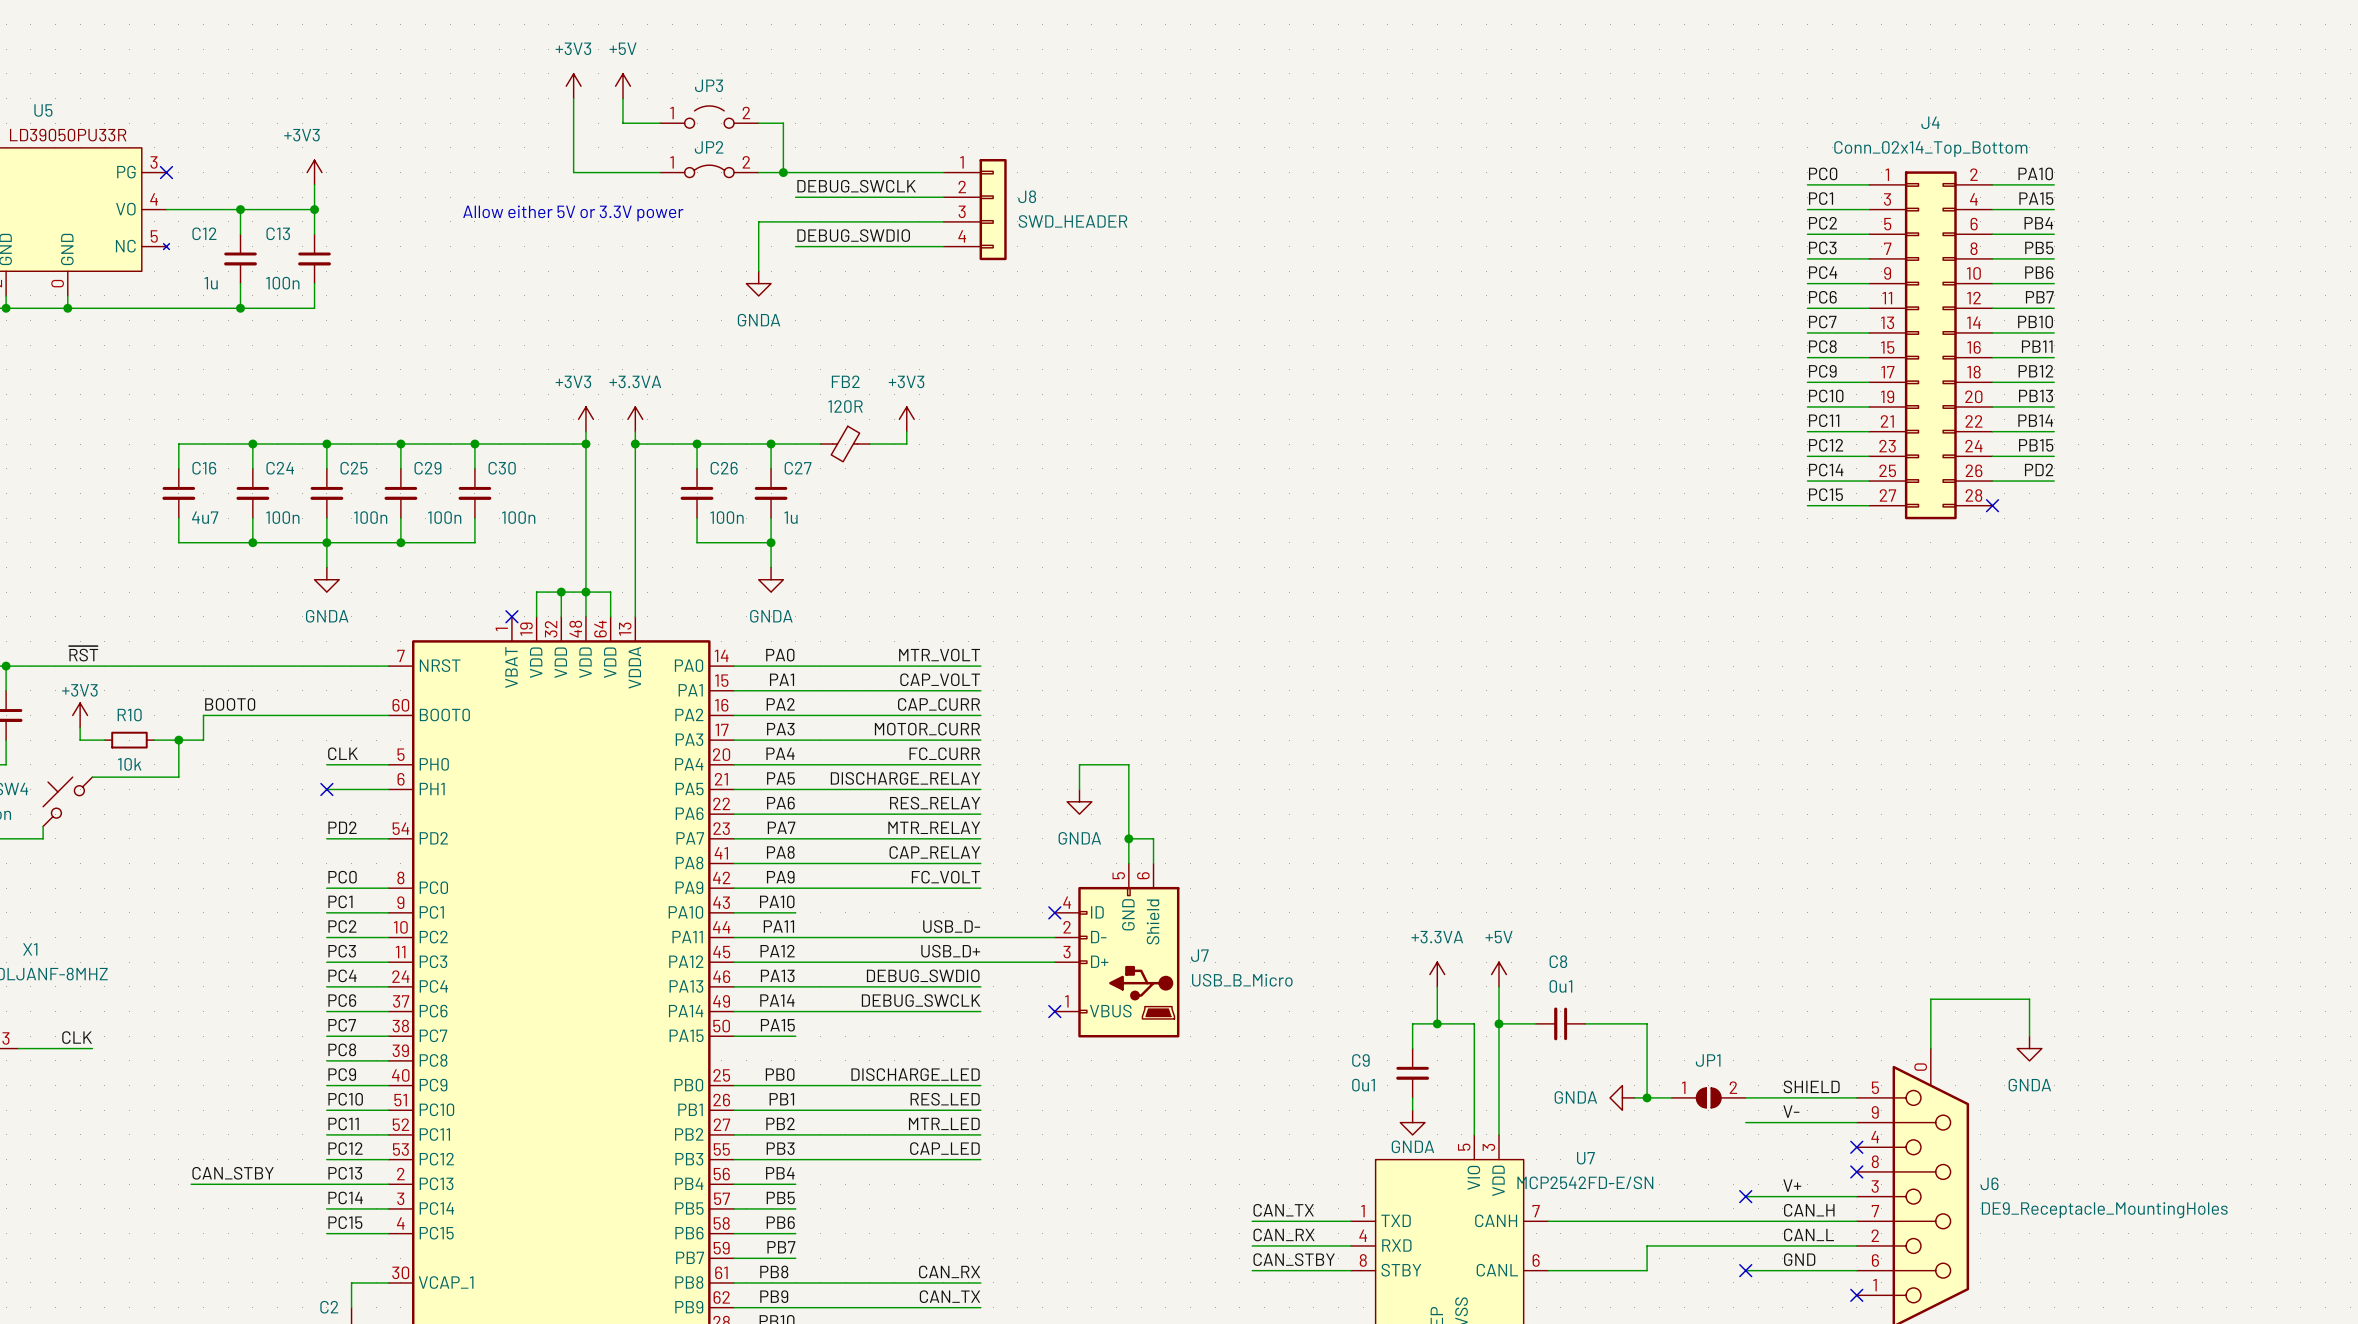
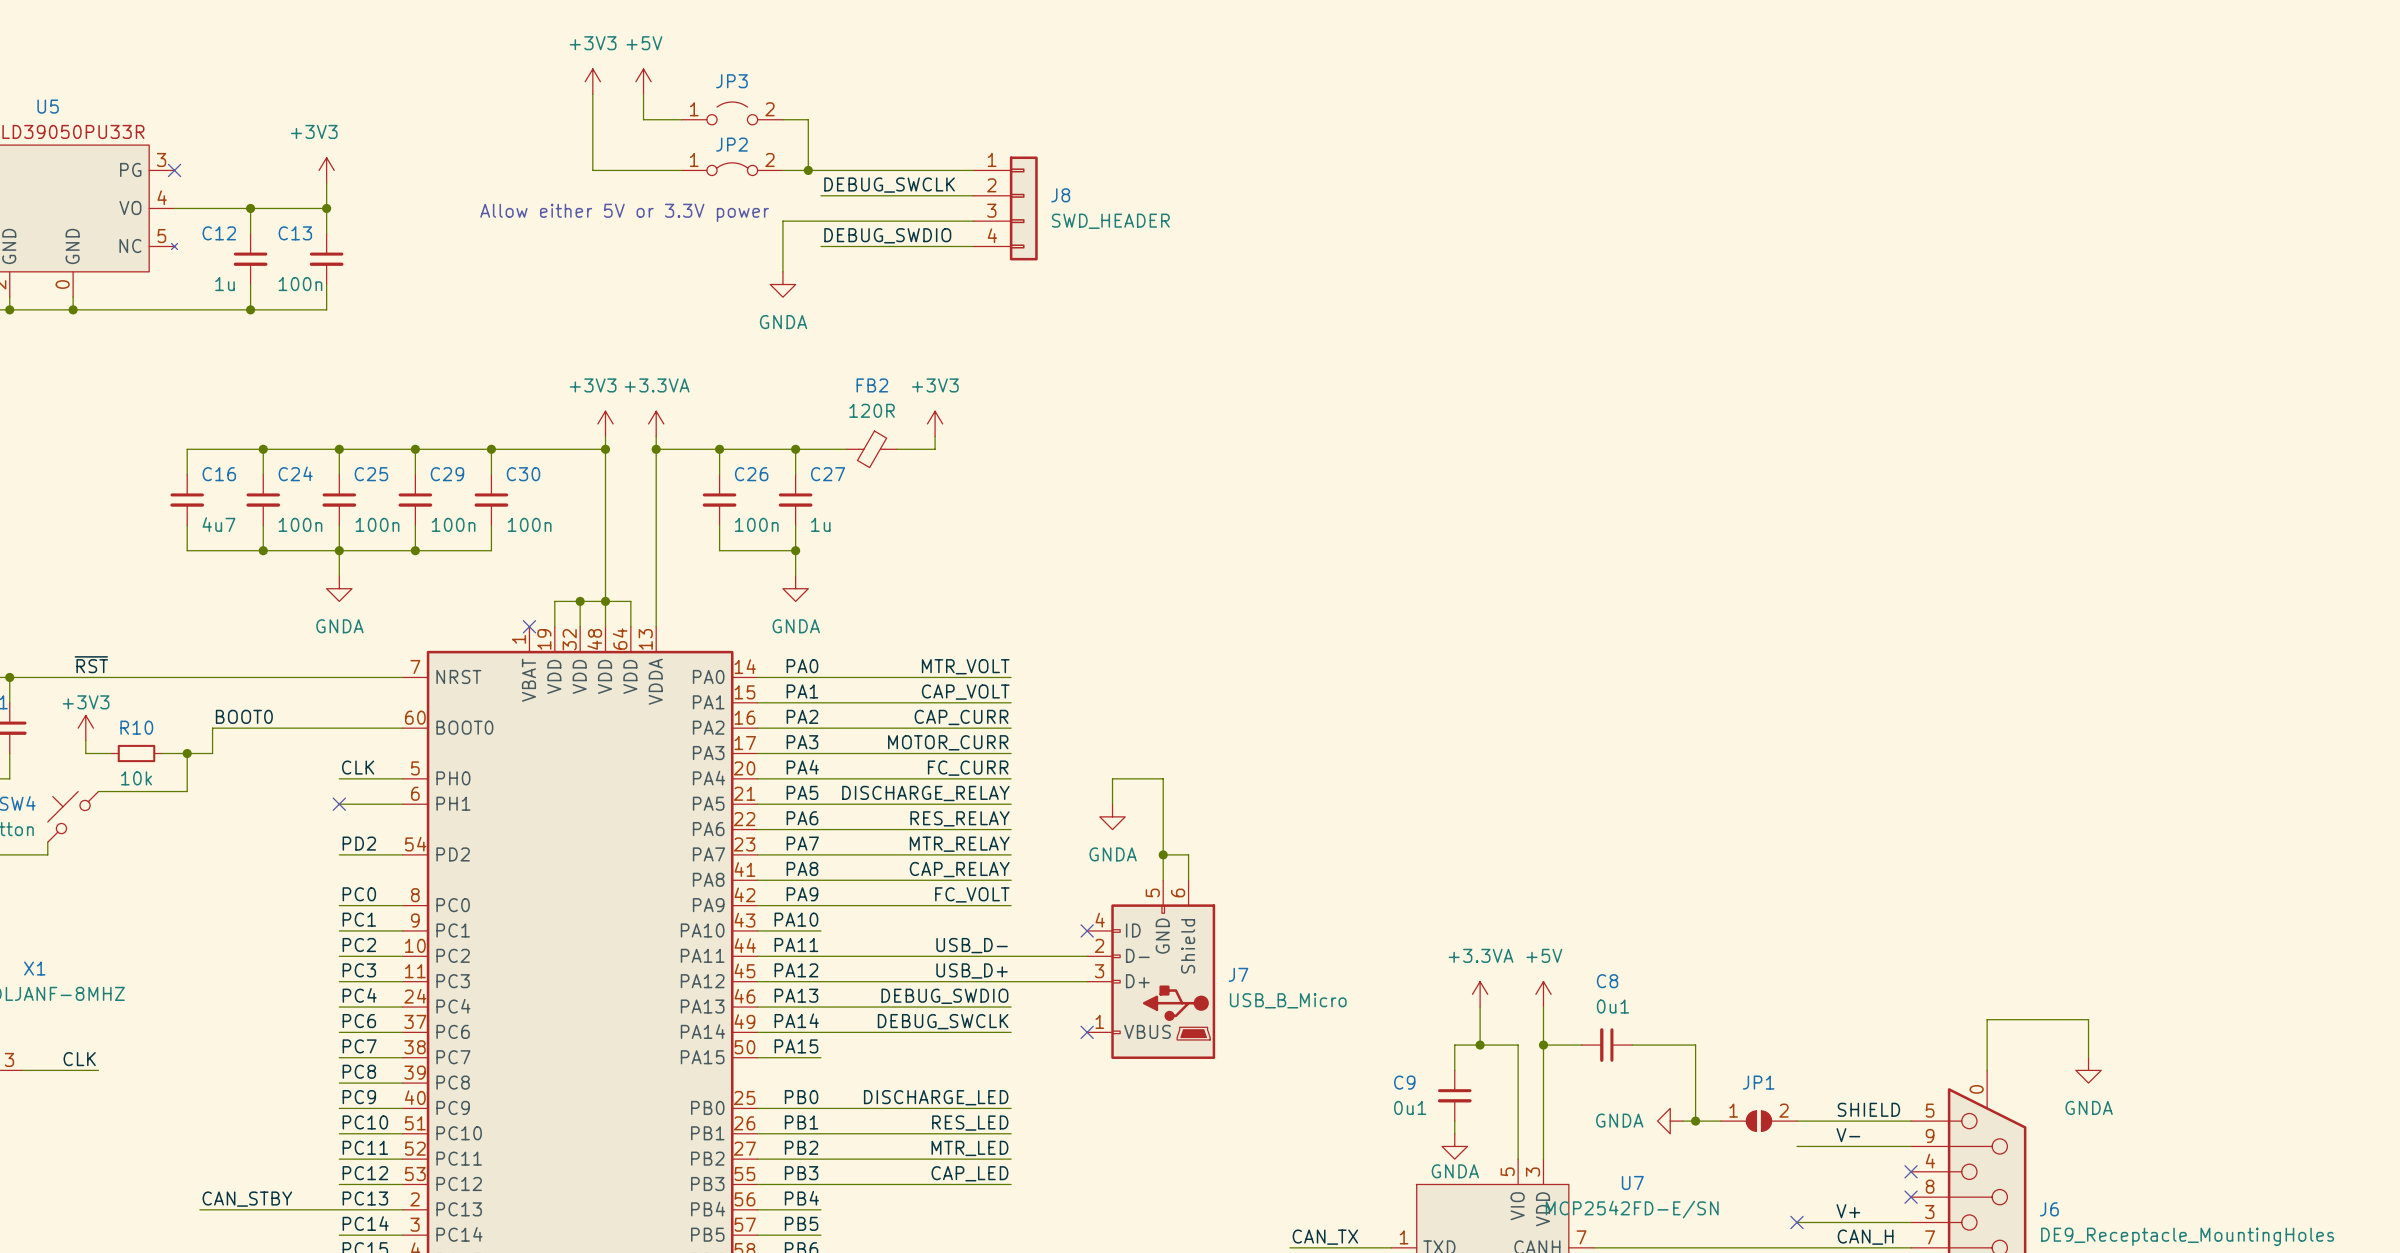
label: PC0 (1823, 173) -> none
label: PA10 (2035, 173) -> none
wire: (1807, 184) (1869, 184) -> none
wire: (1992, 184) (2054, 184) -> none
label: PC1 (1821, 198) -> none
label: PA15 (2036, 198) -> none
wire: (1807, 209) (1869, 209) -> none
wire: (1992, 209) (2054, 209) -> none
label: PC2 (1822, 223) -> none
label: PB4 (2038, 223) -> none
wire: (1807, 234) (1869, 234) -> none
wire: (1992, 234) (2054, 234) -> none
label: PC3 (1822, 247) -> none
label: PB5 (2039, 247) -> none
wire: (1807, 258) (1869, 258) -> none
wire: (1992, 258) (2054, 258) -> none
label: PC4 (1823, 272) -> none
label: PB6 (2039, 272) -> none
wire: (1807, 283) (1869, 283) -> none
wire: (1992, 283) (2054, 283) -> none
label: PC6 (1822, 297) -> none
label: PB7 (2039, 297) -> none
wire: (1807, 308) (1869, 308) -> none
wire: (1992, 308) (2054, 308) -> none
label: PC7 (1822, 321) -> none
label: PB10 (2035, 321) -> none
wire: (1807, 332) (1869, 332) -> none
wire: (1992, 332) (2054, 332) -> none
J4: Conn_02x14_Top_Bottom (1930, 345) -> none
label: PC8 (1822, 346) -> none
label: PB11 (2037, 346) -> none
wire: (1807, 357) (1869, 357) -> none
wire: (1992, 357) (2054, 357) -> none
label: PC9 (1822, 371) -> none
label: PB12 (2035, 371) -> none
wire: (1807, 382) (1869, 382) -> none
wire: (1992, 382) (2054, 382) -> none
label: PC10 (1826, 395) -> none
label: PB13 (2036, 396) -> none
wire: (1807, 406) (1869, 406) -> none
wire: (1992, 406) (2054, 406) -> none
label: PC11 (1824, 420) -> none
label: PB14 (2035, 420) -> none
wire: (1807, 431) (1869, 431) -> none
wire: (1992, 431) (2054, 431) -> none
label: PC12 (1826, 445) -> none
label: PB15 (2036, 445) -> none
wire: (1807, 456) (1869, 456) -> none
wire: (1992, 456) (2054, 456) -> none
label: PD2 (2039, 469) -> none
label: PC14 (1826, 470) -> none
wire: (1807, 481) (1869, 481) -> none
wire: (1992, 481) (2054, 481) -> none
label: PC15 (1825, 494) -> none
wire: (1807, 505) (1869, 505) -> none
no-connect mark: (1992, 505) -> none

